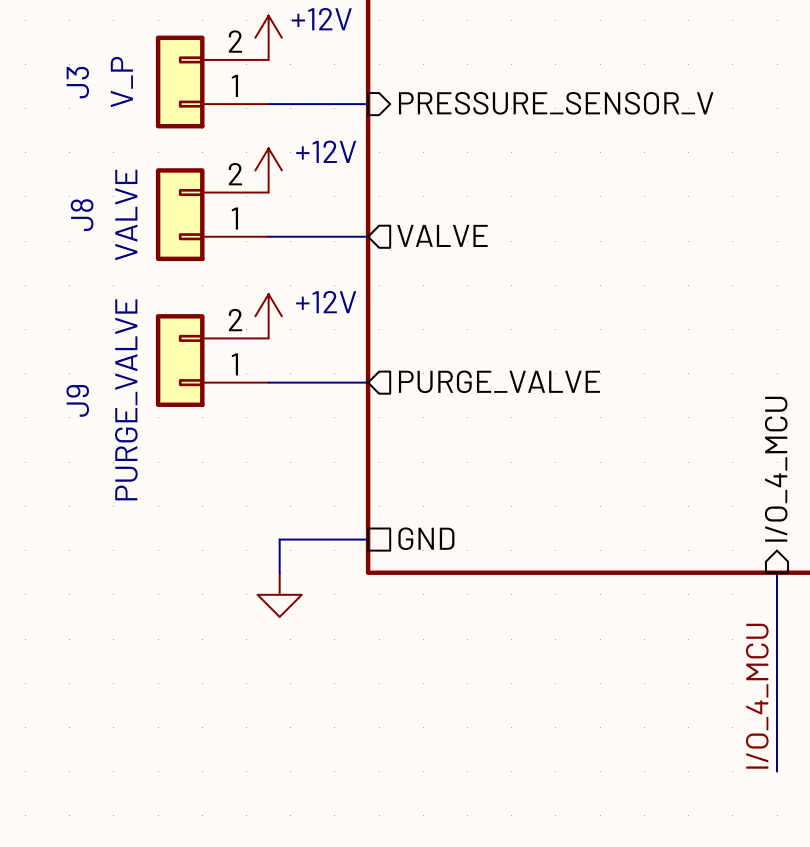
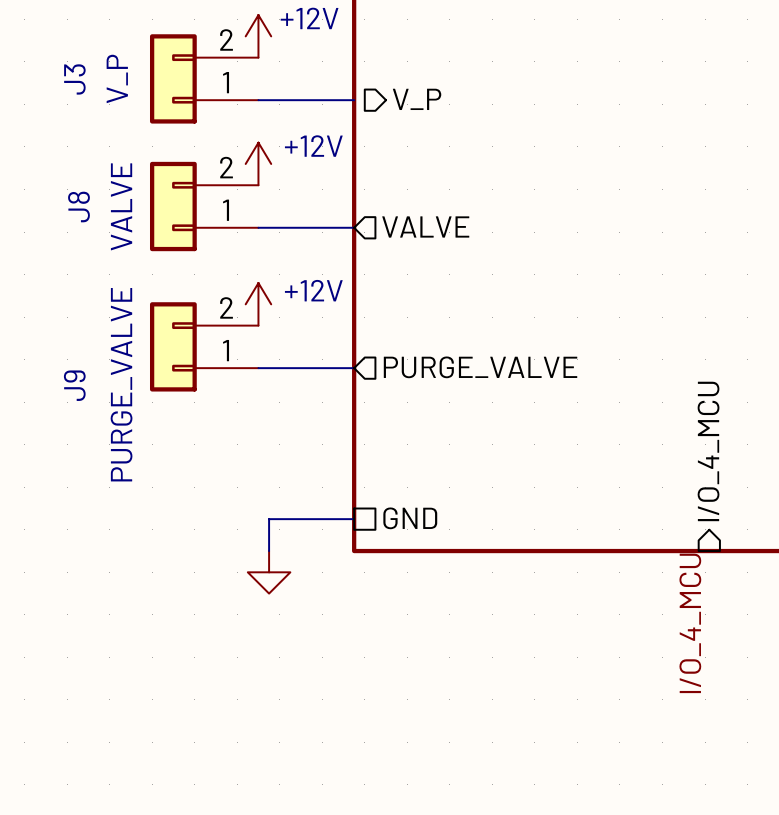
sheet pin: PRESSURE_SENSOR_V (556, 103) -> V_P (417, 99)
sheet pin position: I/O_4_MCU (776, 469) -> I/O_4_MCU (708, 451)
wire: (777, 572) (777, 771) -> none
label position: I/O_4_MCU (757, 696) -> I/O_4_MCU (690, 623)

